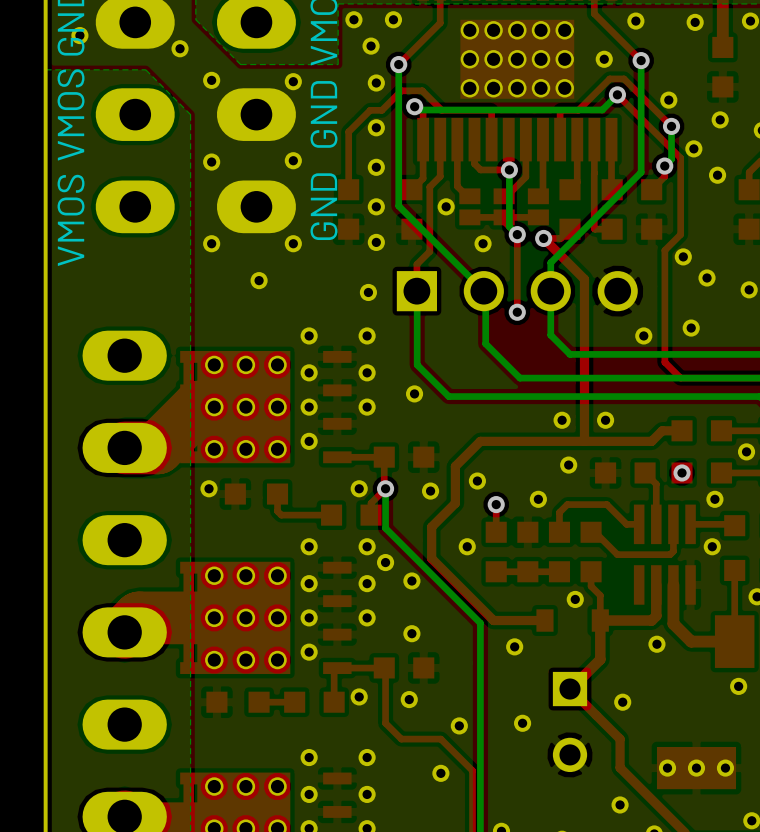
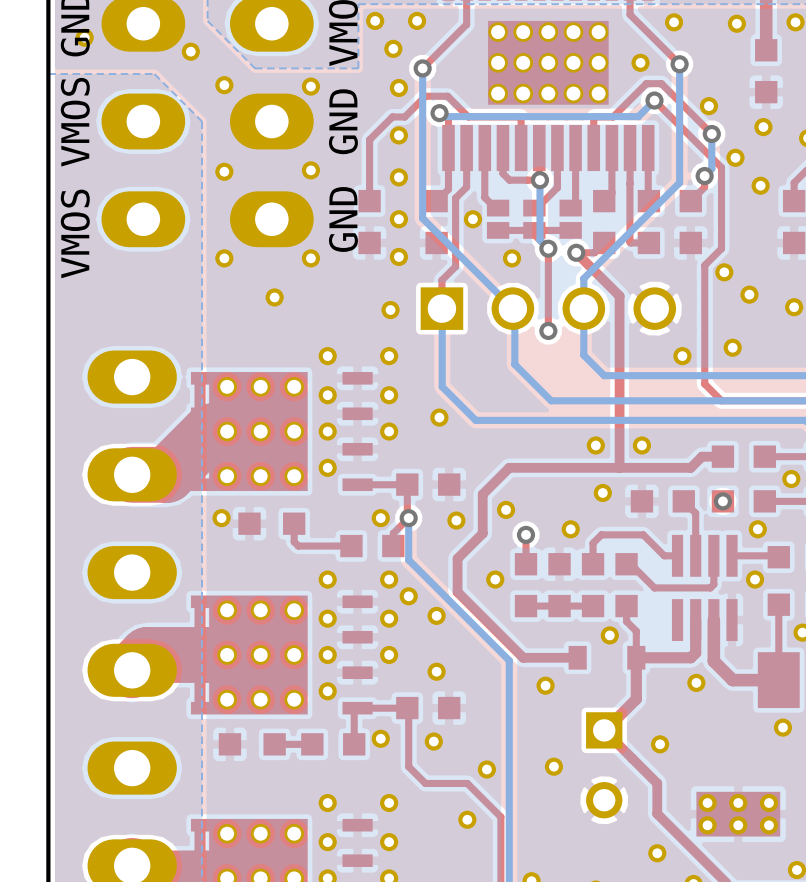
part: none -> (707, 803)
part: none -> (738, 803)
part: none -> (769, 803)
part: (667, 768) -> none
part: (696, 768) -> none
part: (725, 768) -> none
part: none -> (707, 825)
part: none -> (738, 825)
part: none -> (769, 825)

